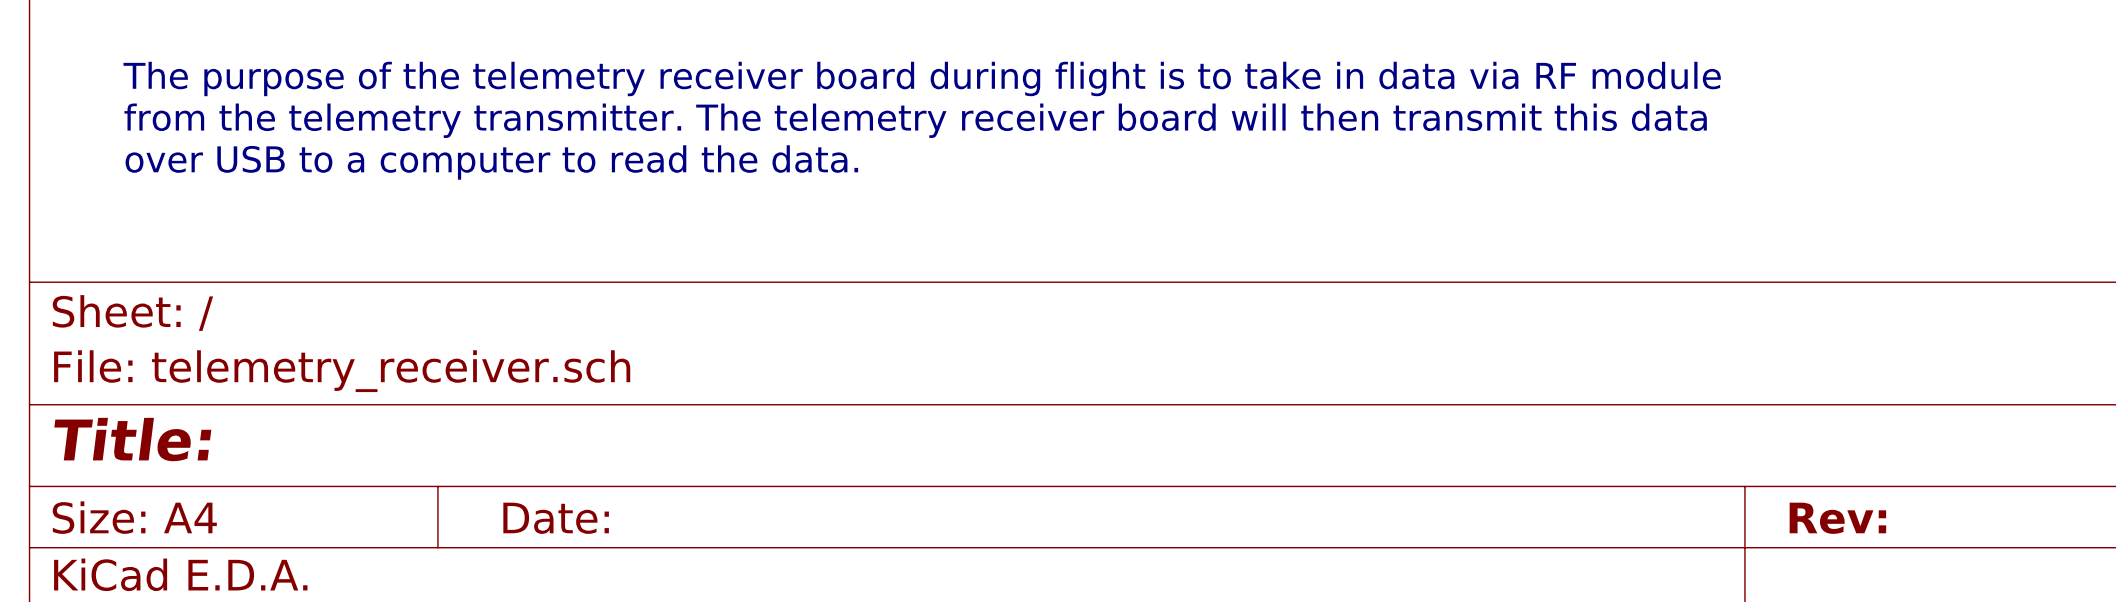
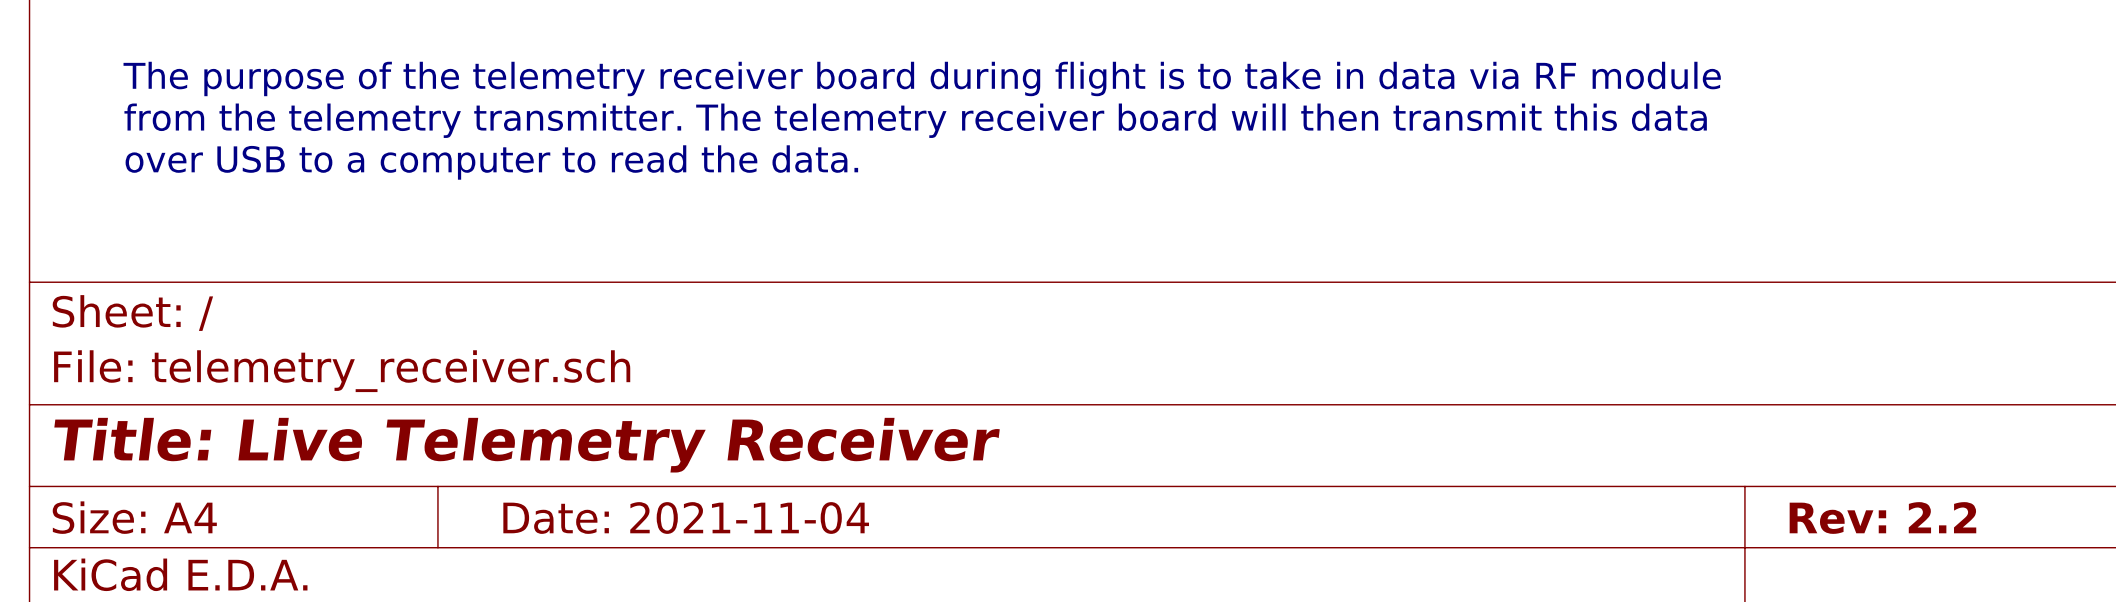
title block: Title: (132, 439) -> Title: Live Telemetry Receiver (527, 445)
title block: Date: (556, 518) -> Date: 2021-11-04 (686, 518)
title block: Rev: (1837, 518) -> Rev: 2.2 (1882, 518)

